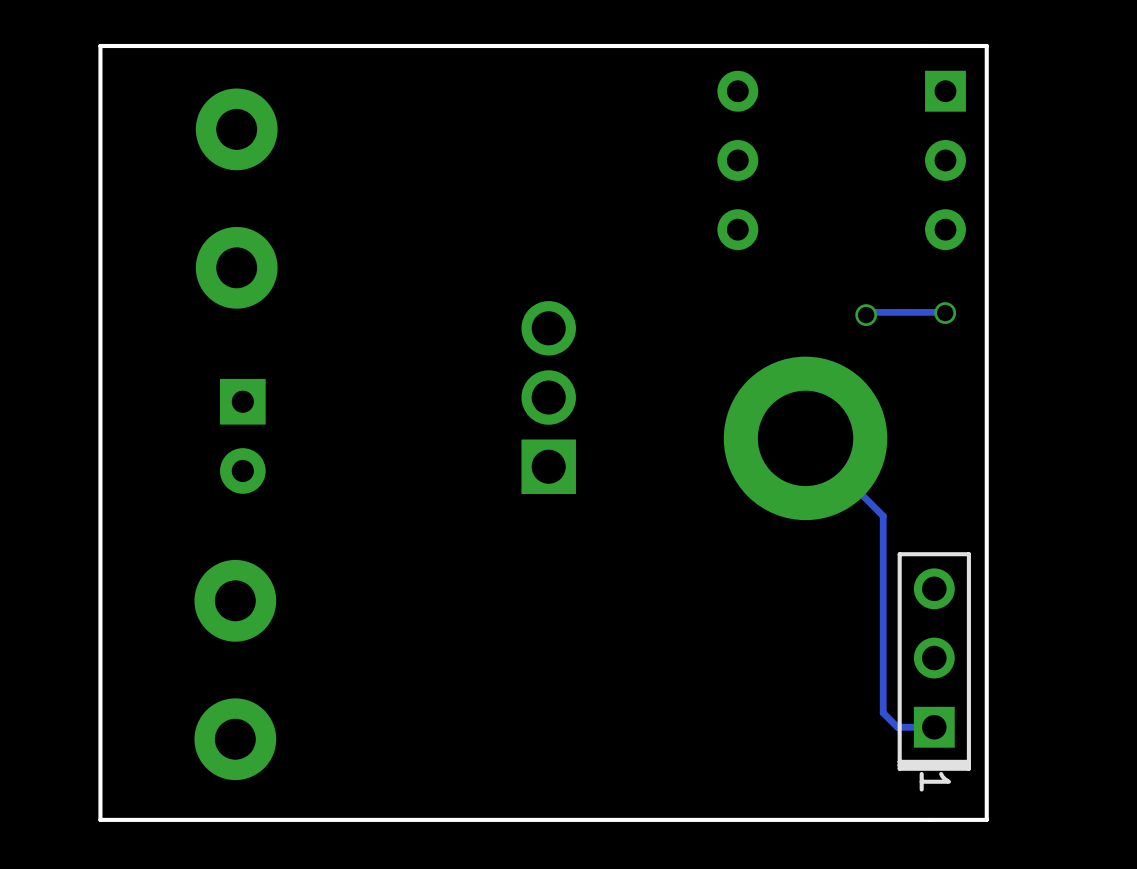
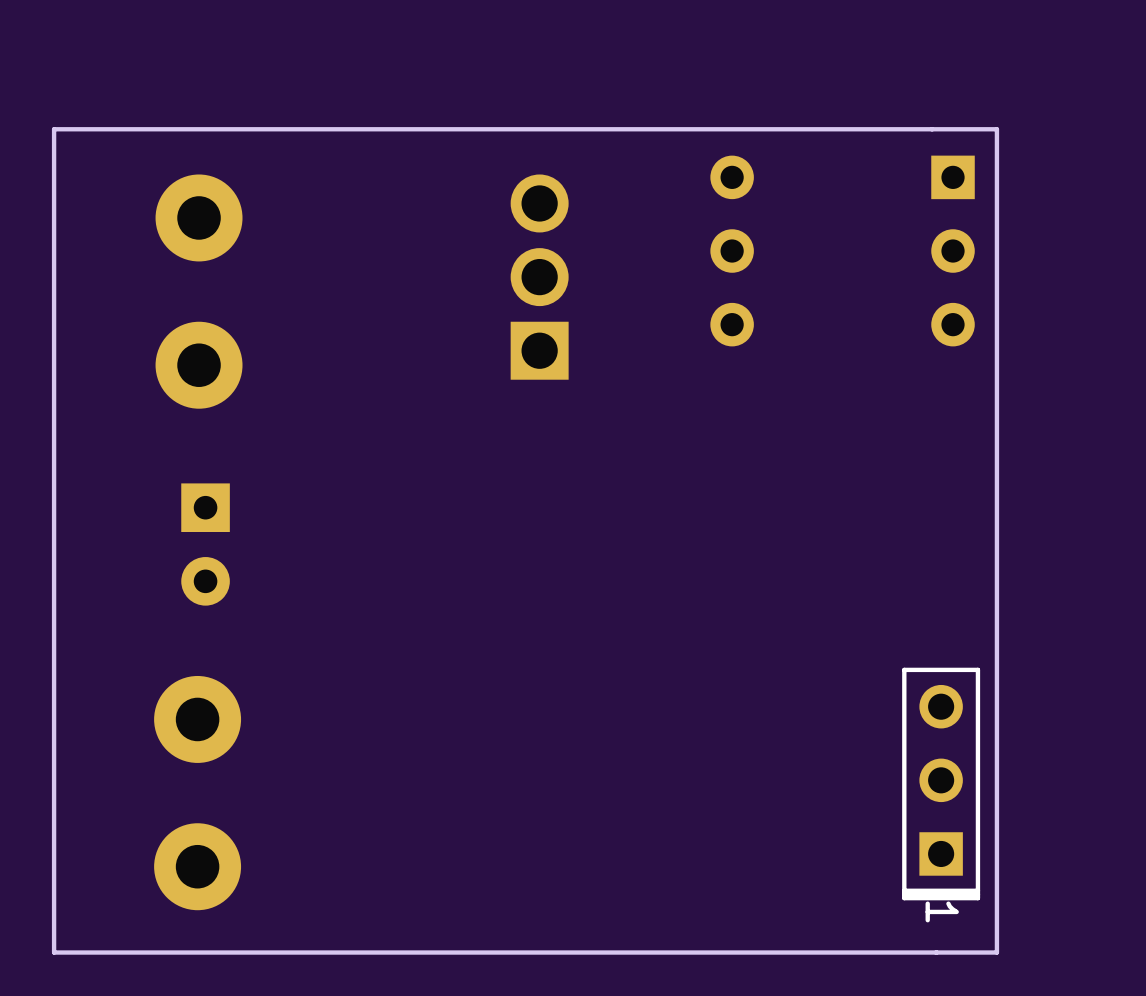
track: (945, 313) (868, 312) (866, 315) -> none
via: (945, 313) -> none
via: (866, 315) -> none
part position: (548, 397) -> (539, 277)
track: (805, 438) (883, 516) (883, 712) (897, 727) (934, 727) -> none
part: (805, 438) -> none

